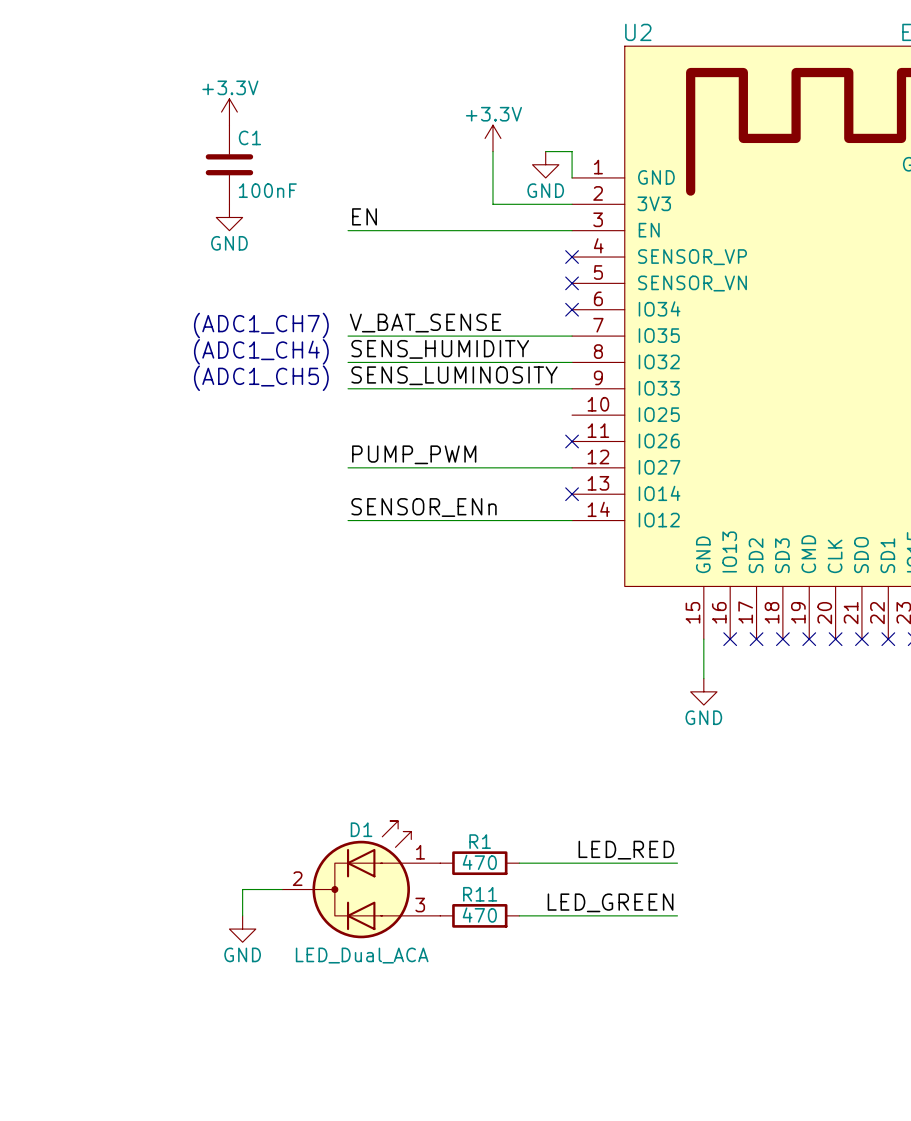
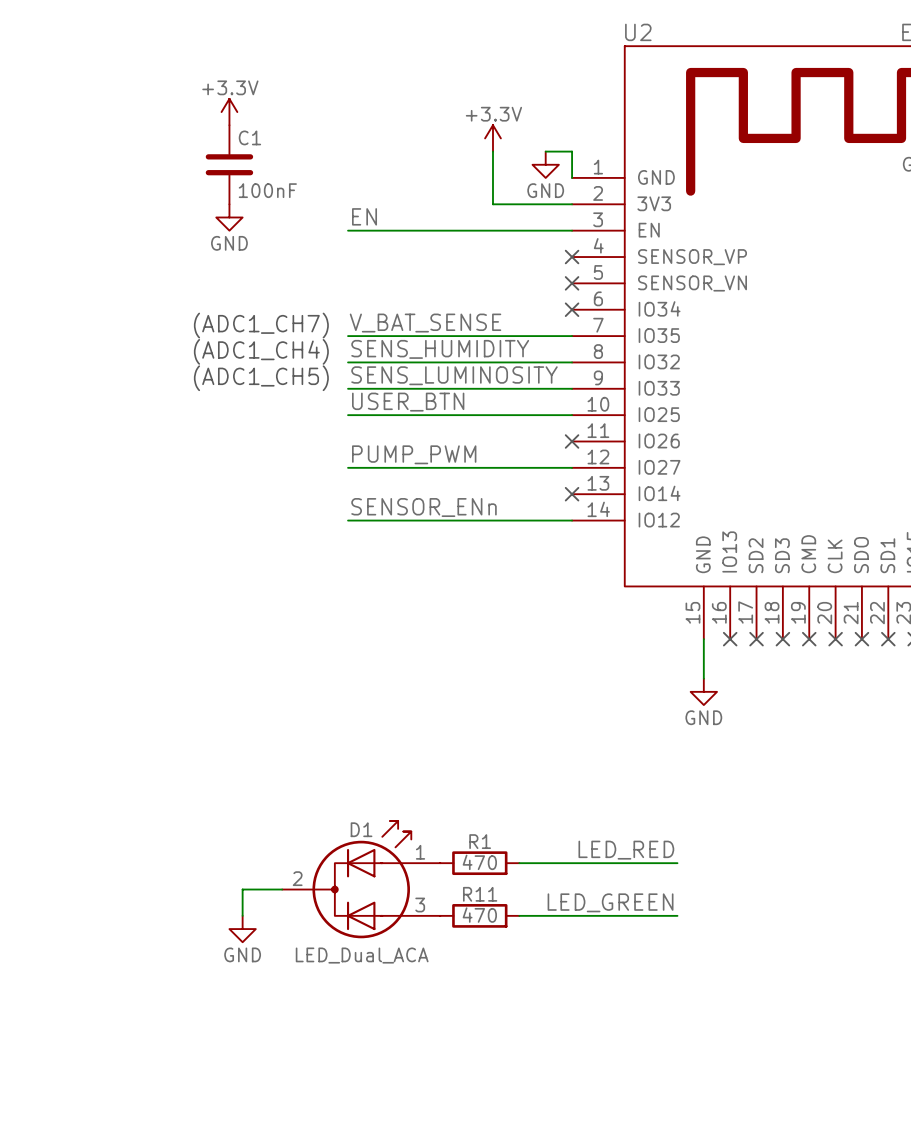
label: none -> USER_BTN (408, 402)
wire: none -> (348, 415) (572, 415)

